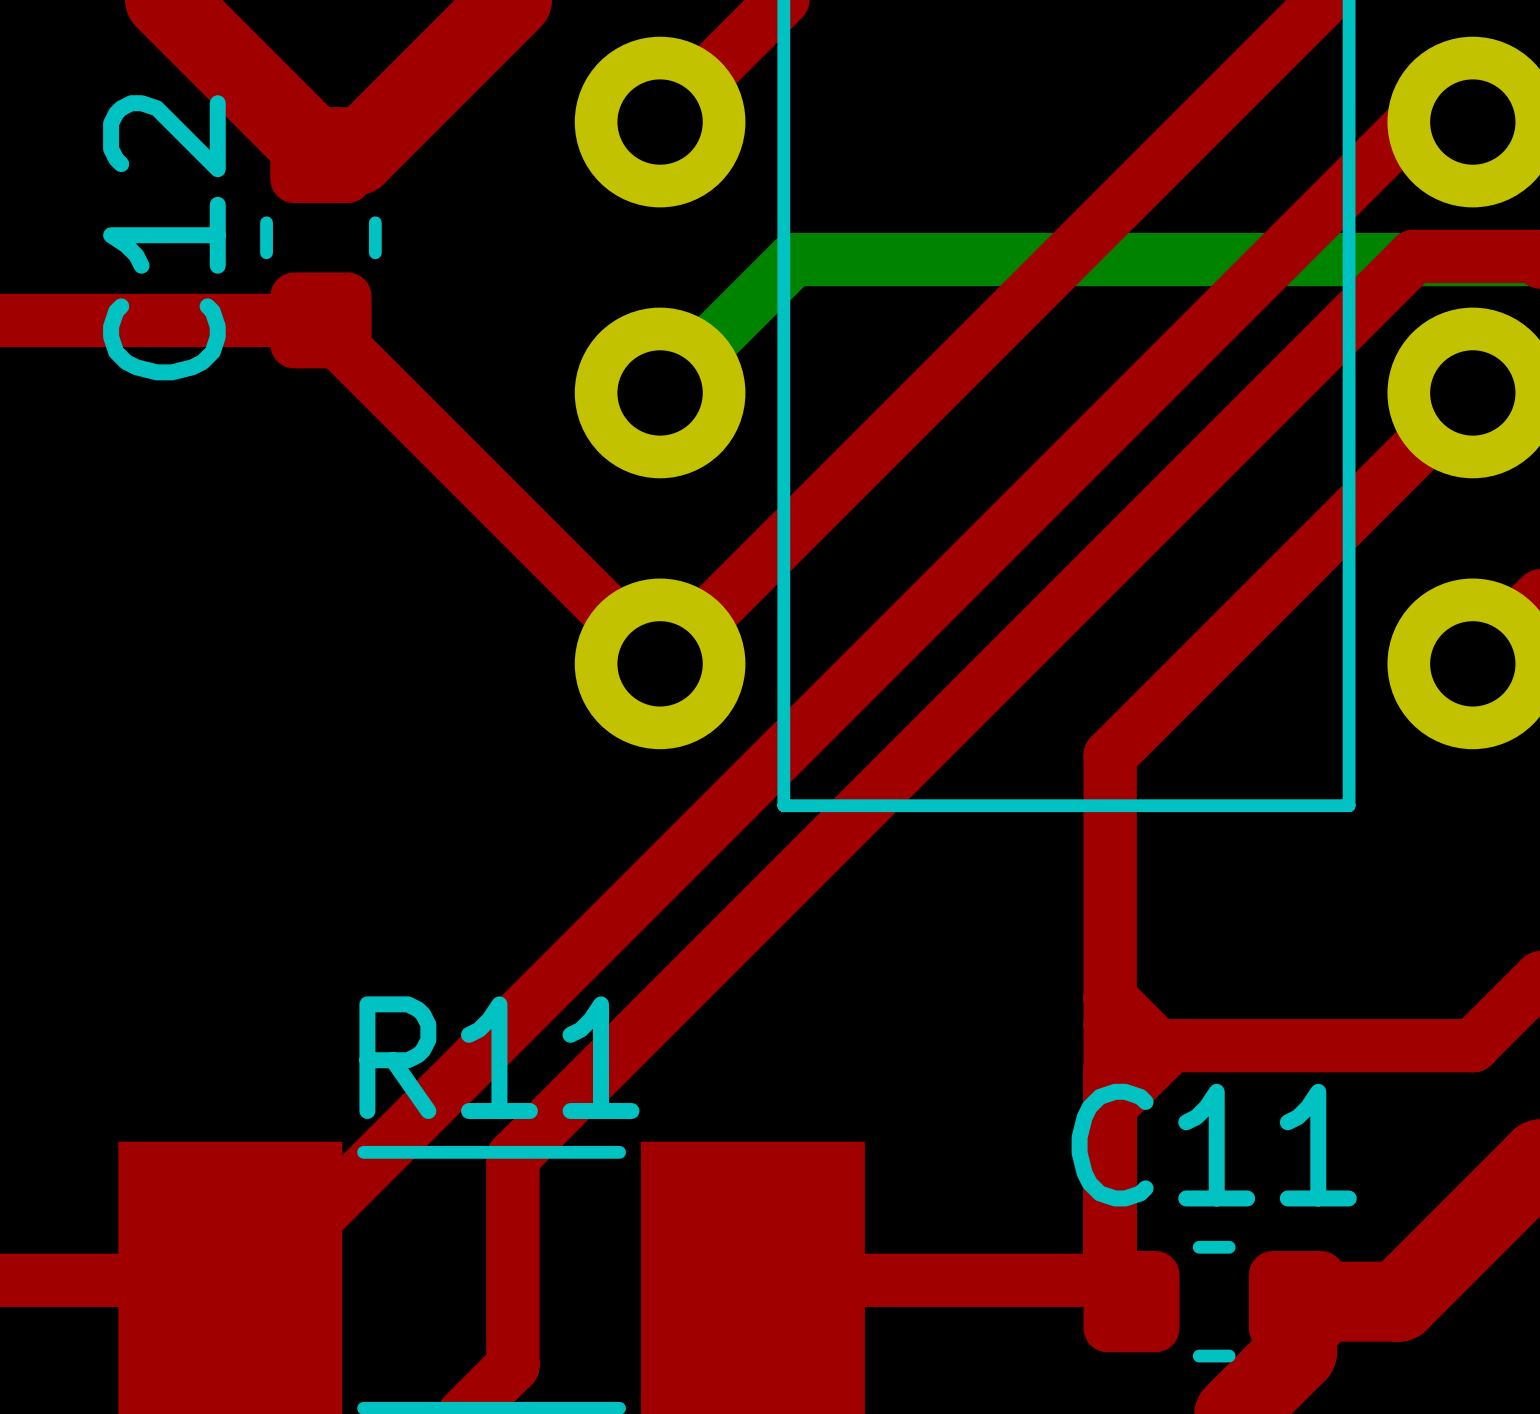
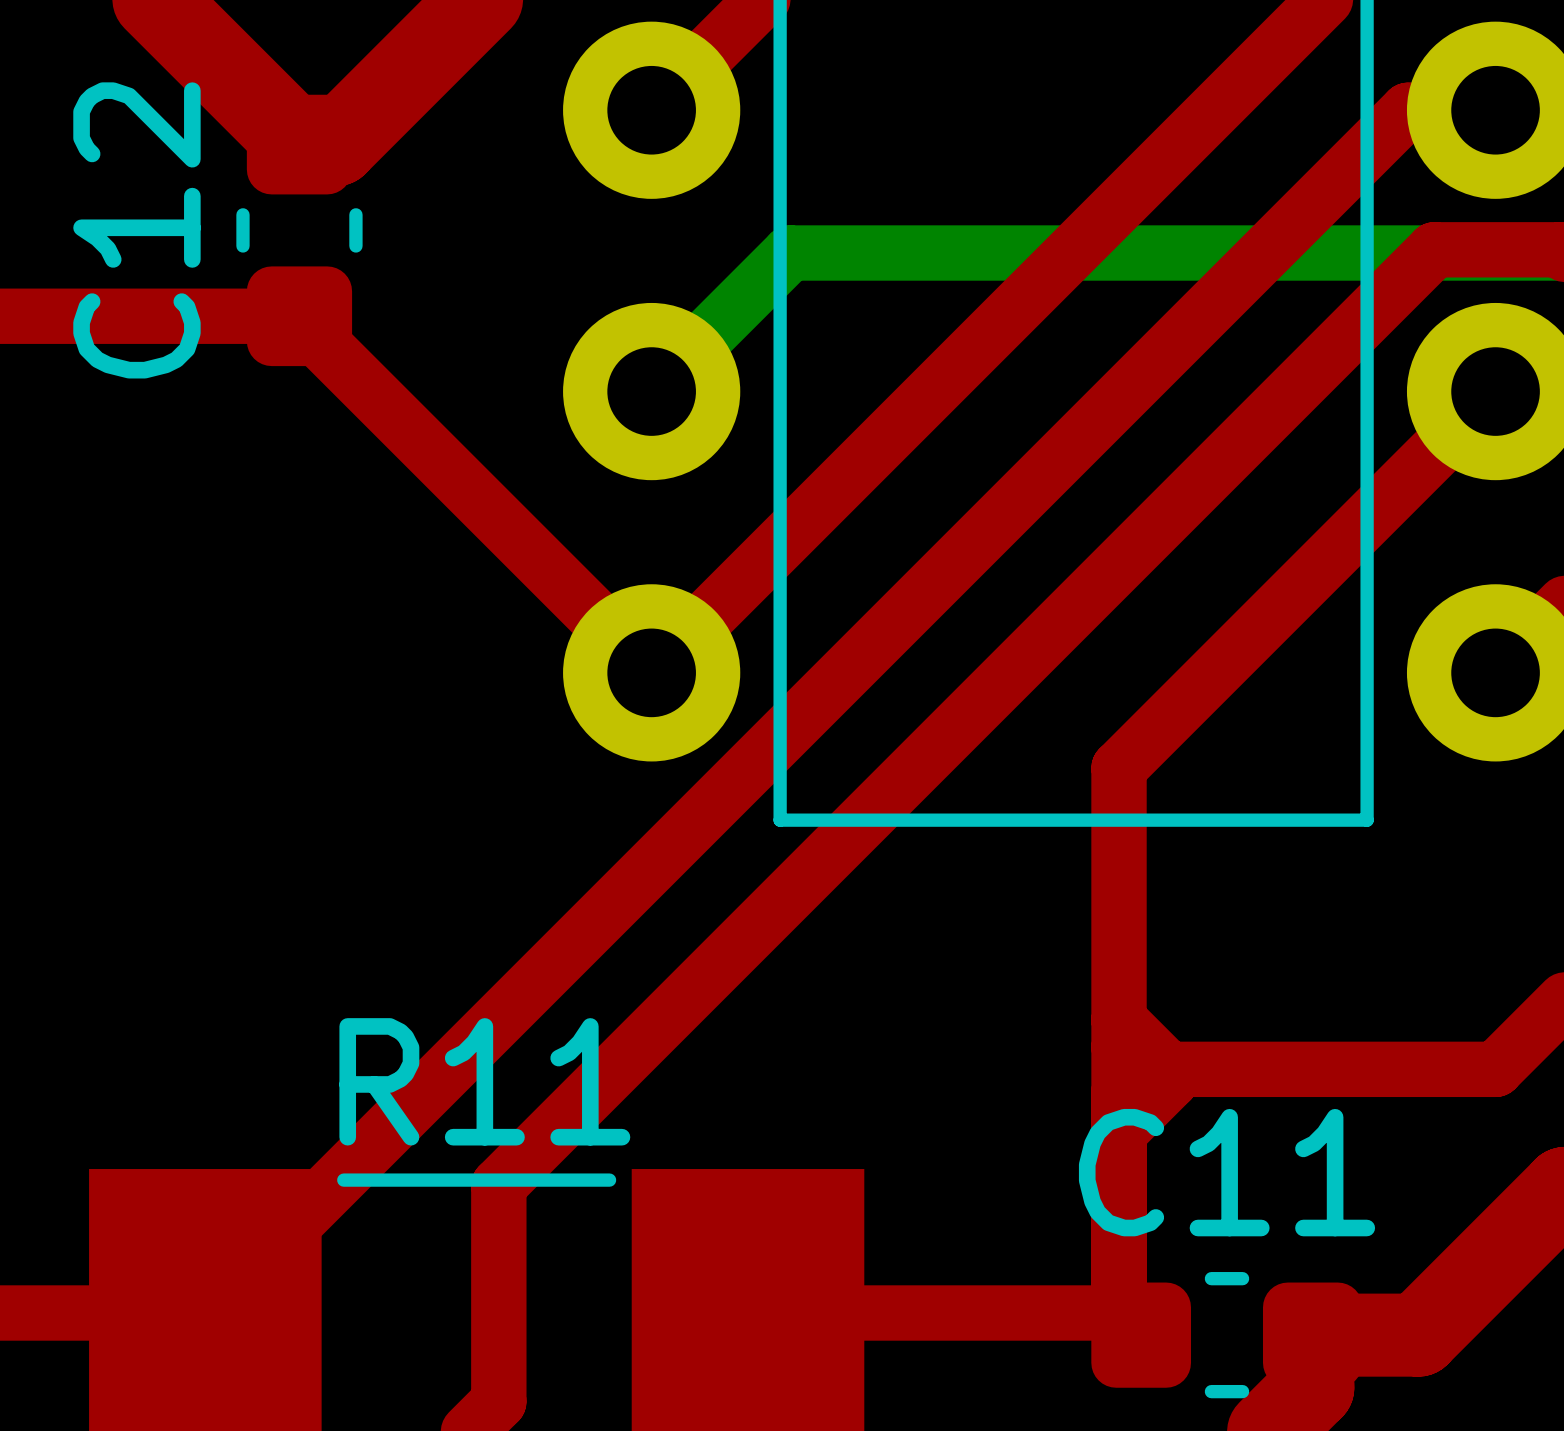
top track: (1413, 122) (254, 1280) (230, 1280) -> (1433, 110) (1408, 110) (205, 1312)

